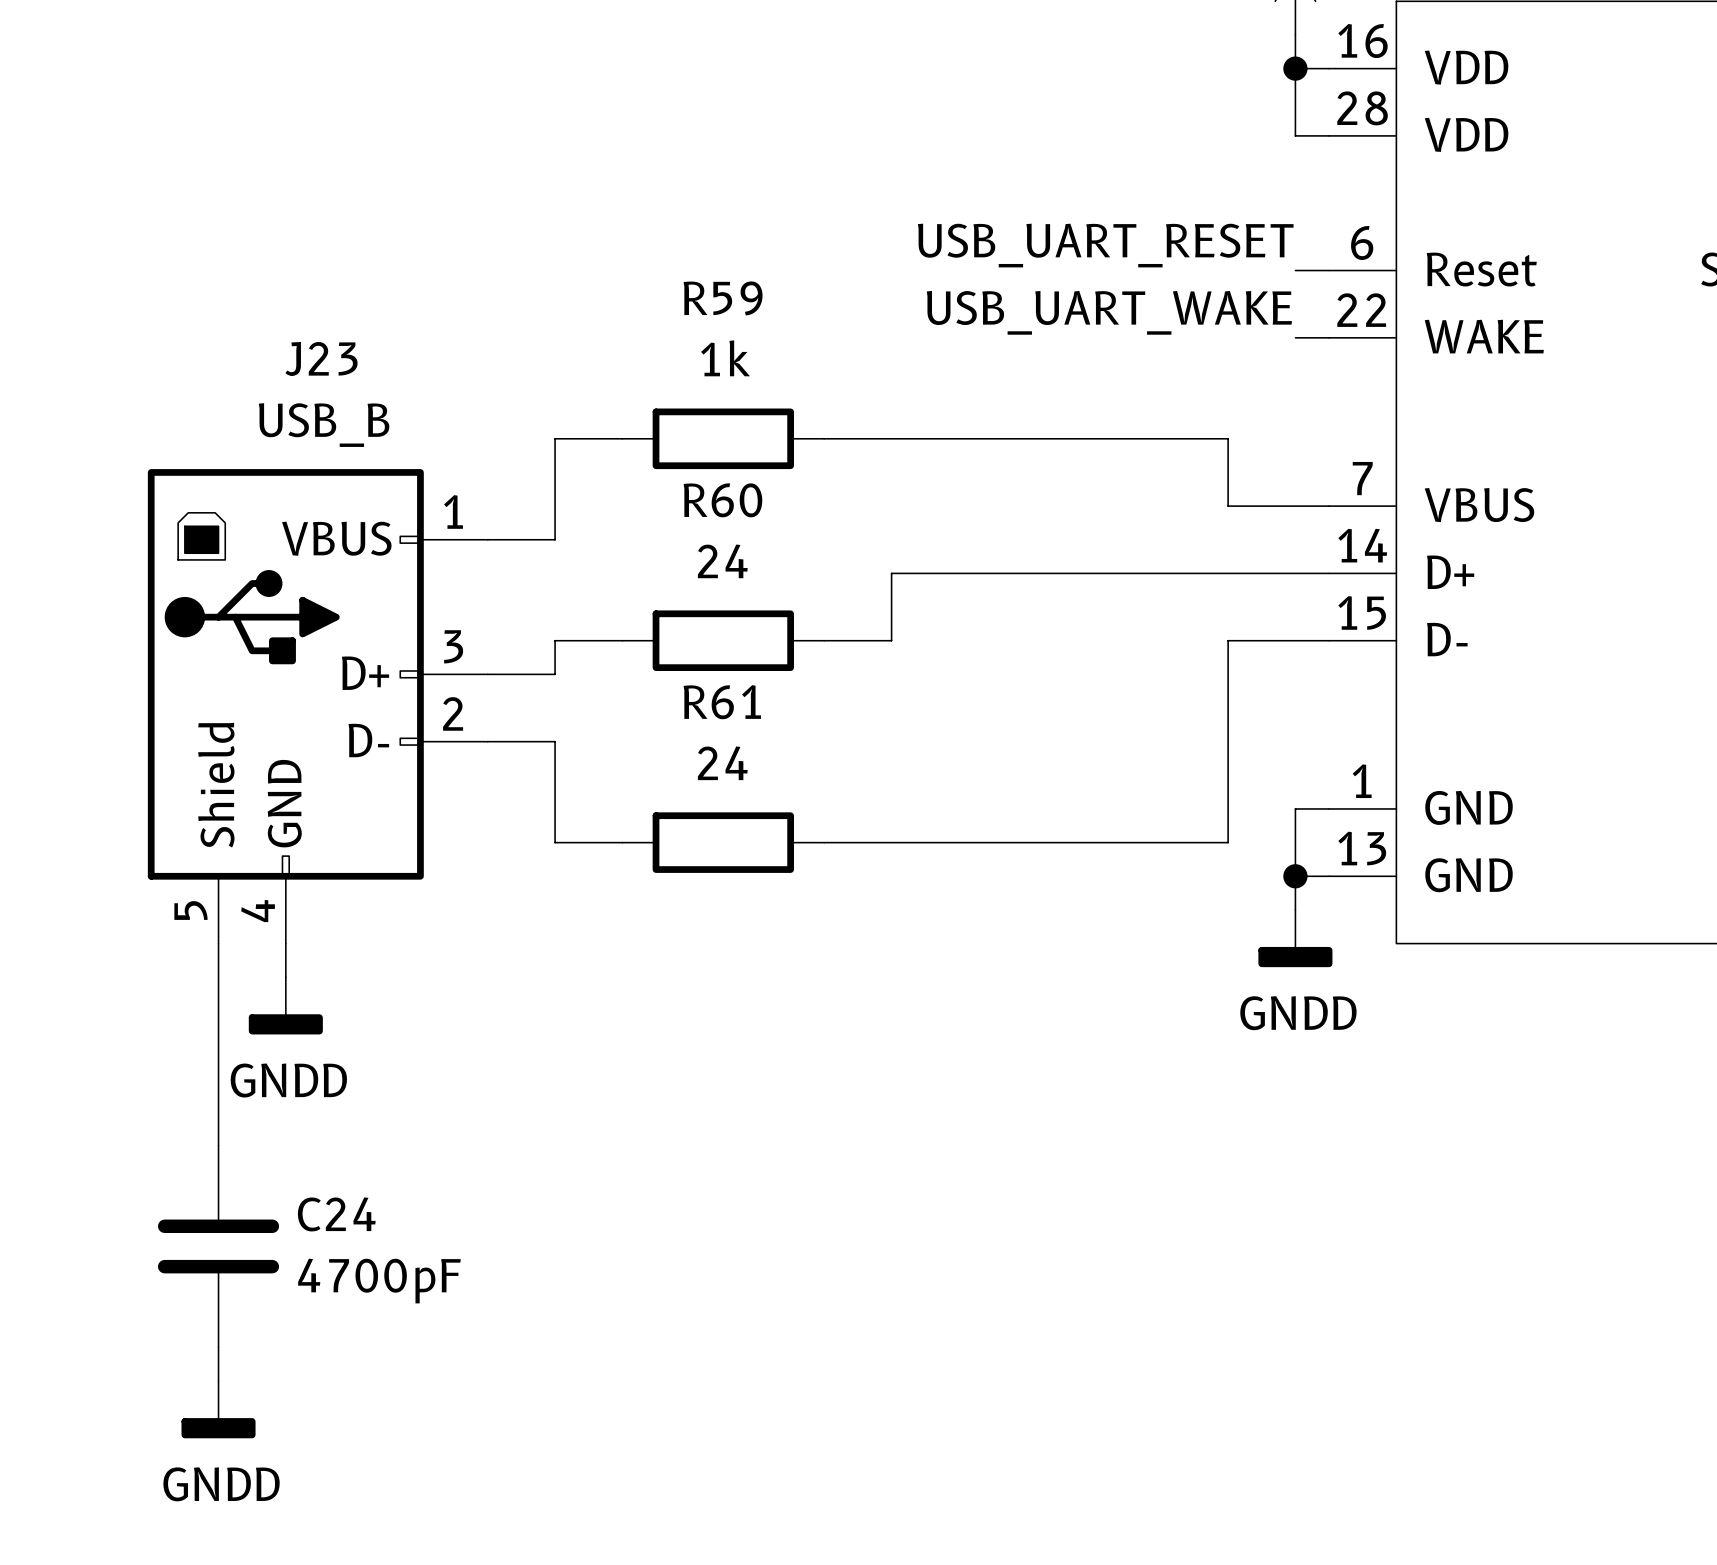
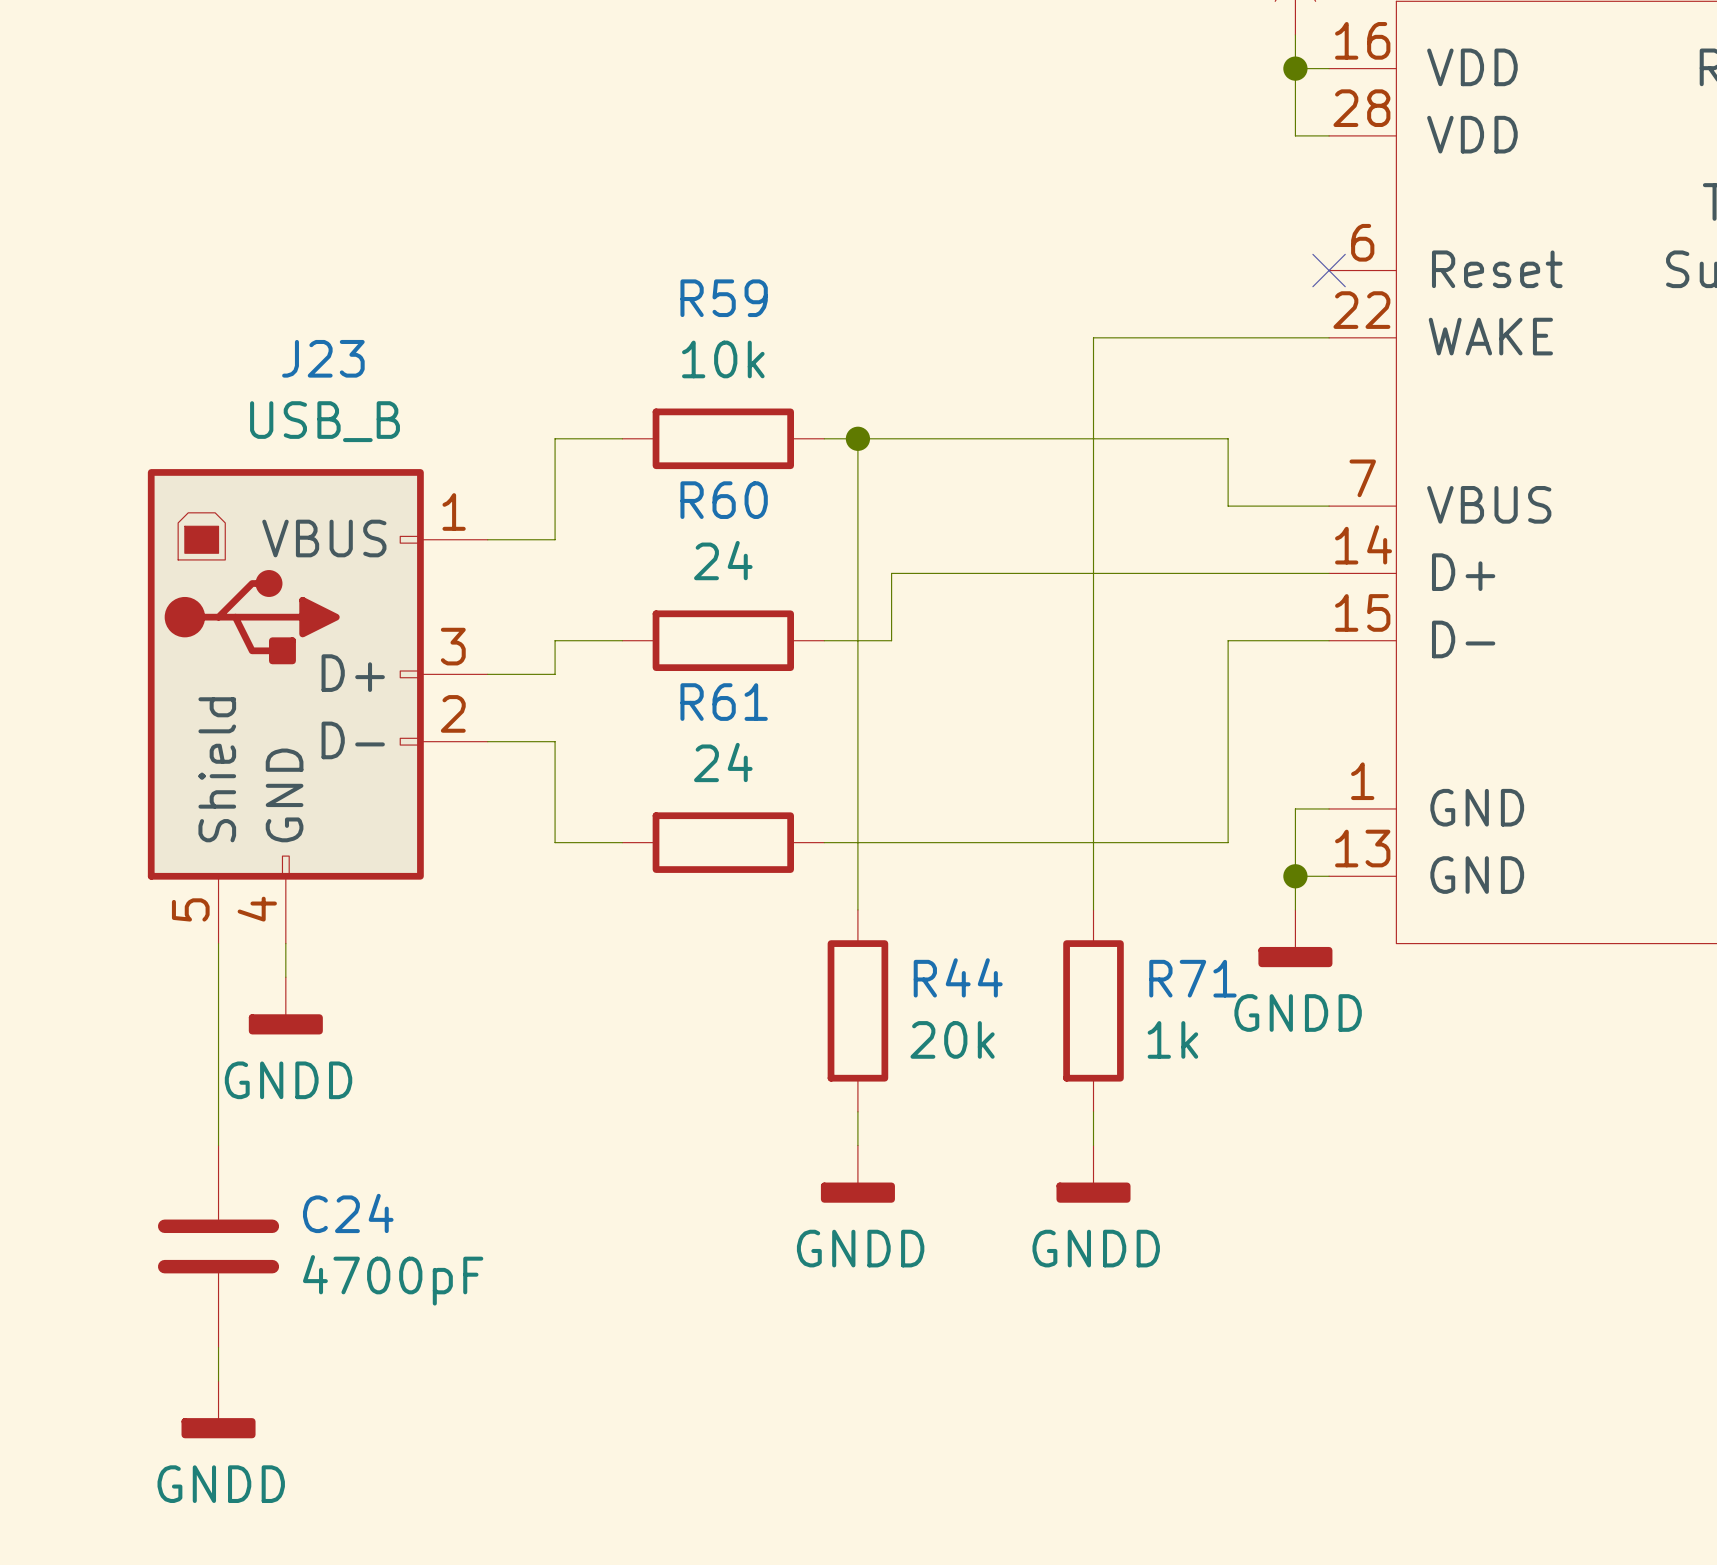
label: USB_UART_RESET (1105, 245) -> none
wire: (1295, 270) (1329, 270) -> none
no-connect mark: none -> (1329, 270)
label: USB_UART_WAKE (1109, 312) -> none
wire: none -> (1295, 337) (1093, 337) (1093, 909)
R59 value: 1k (725, 358) -> 10k (723, 359)
wire: none -> (857, 438) (857, 909)
junction: none -> (857, 438)
R44: none -> 20k (857, 1010)
R71: none -> 1k (1093, 1010)
wire: none -> (857, 1111) (857, 1145)
wire: none -> (1093, 1111) (1093, 1145)
power symbol: none -> GNDD (857, 1174)
power symbol: none -> GNDD (1093, 1174)

